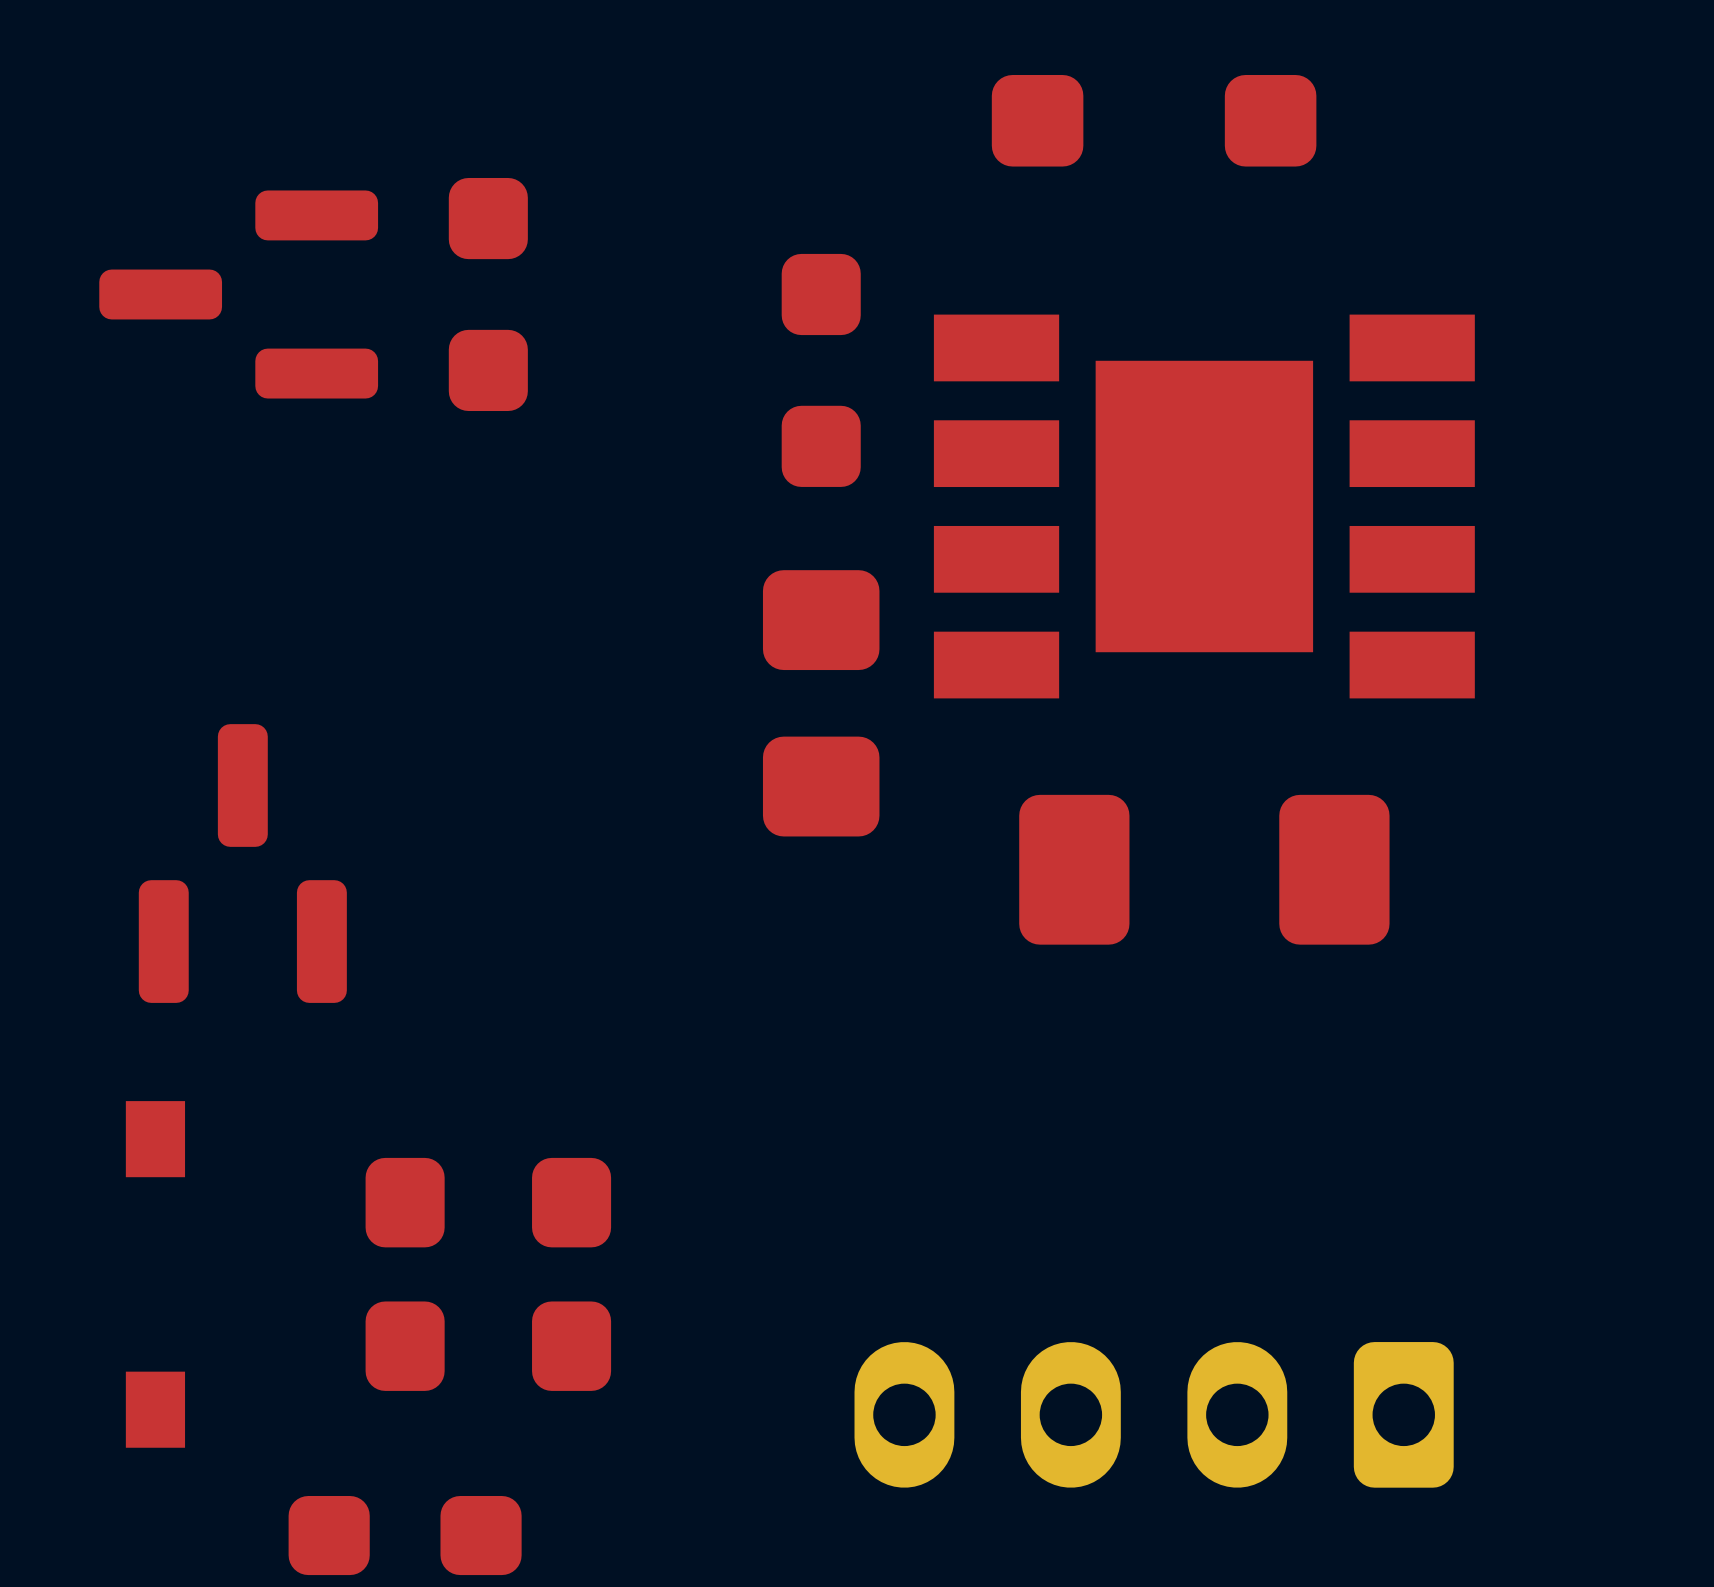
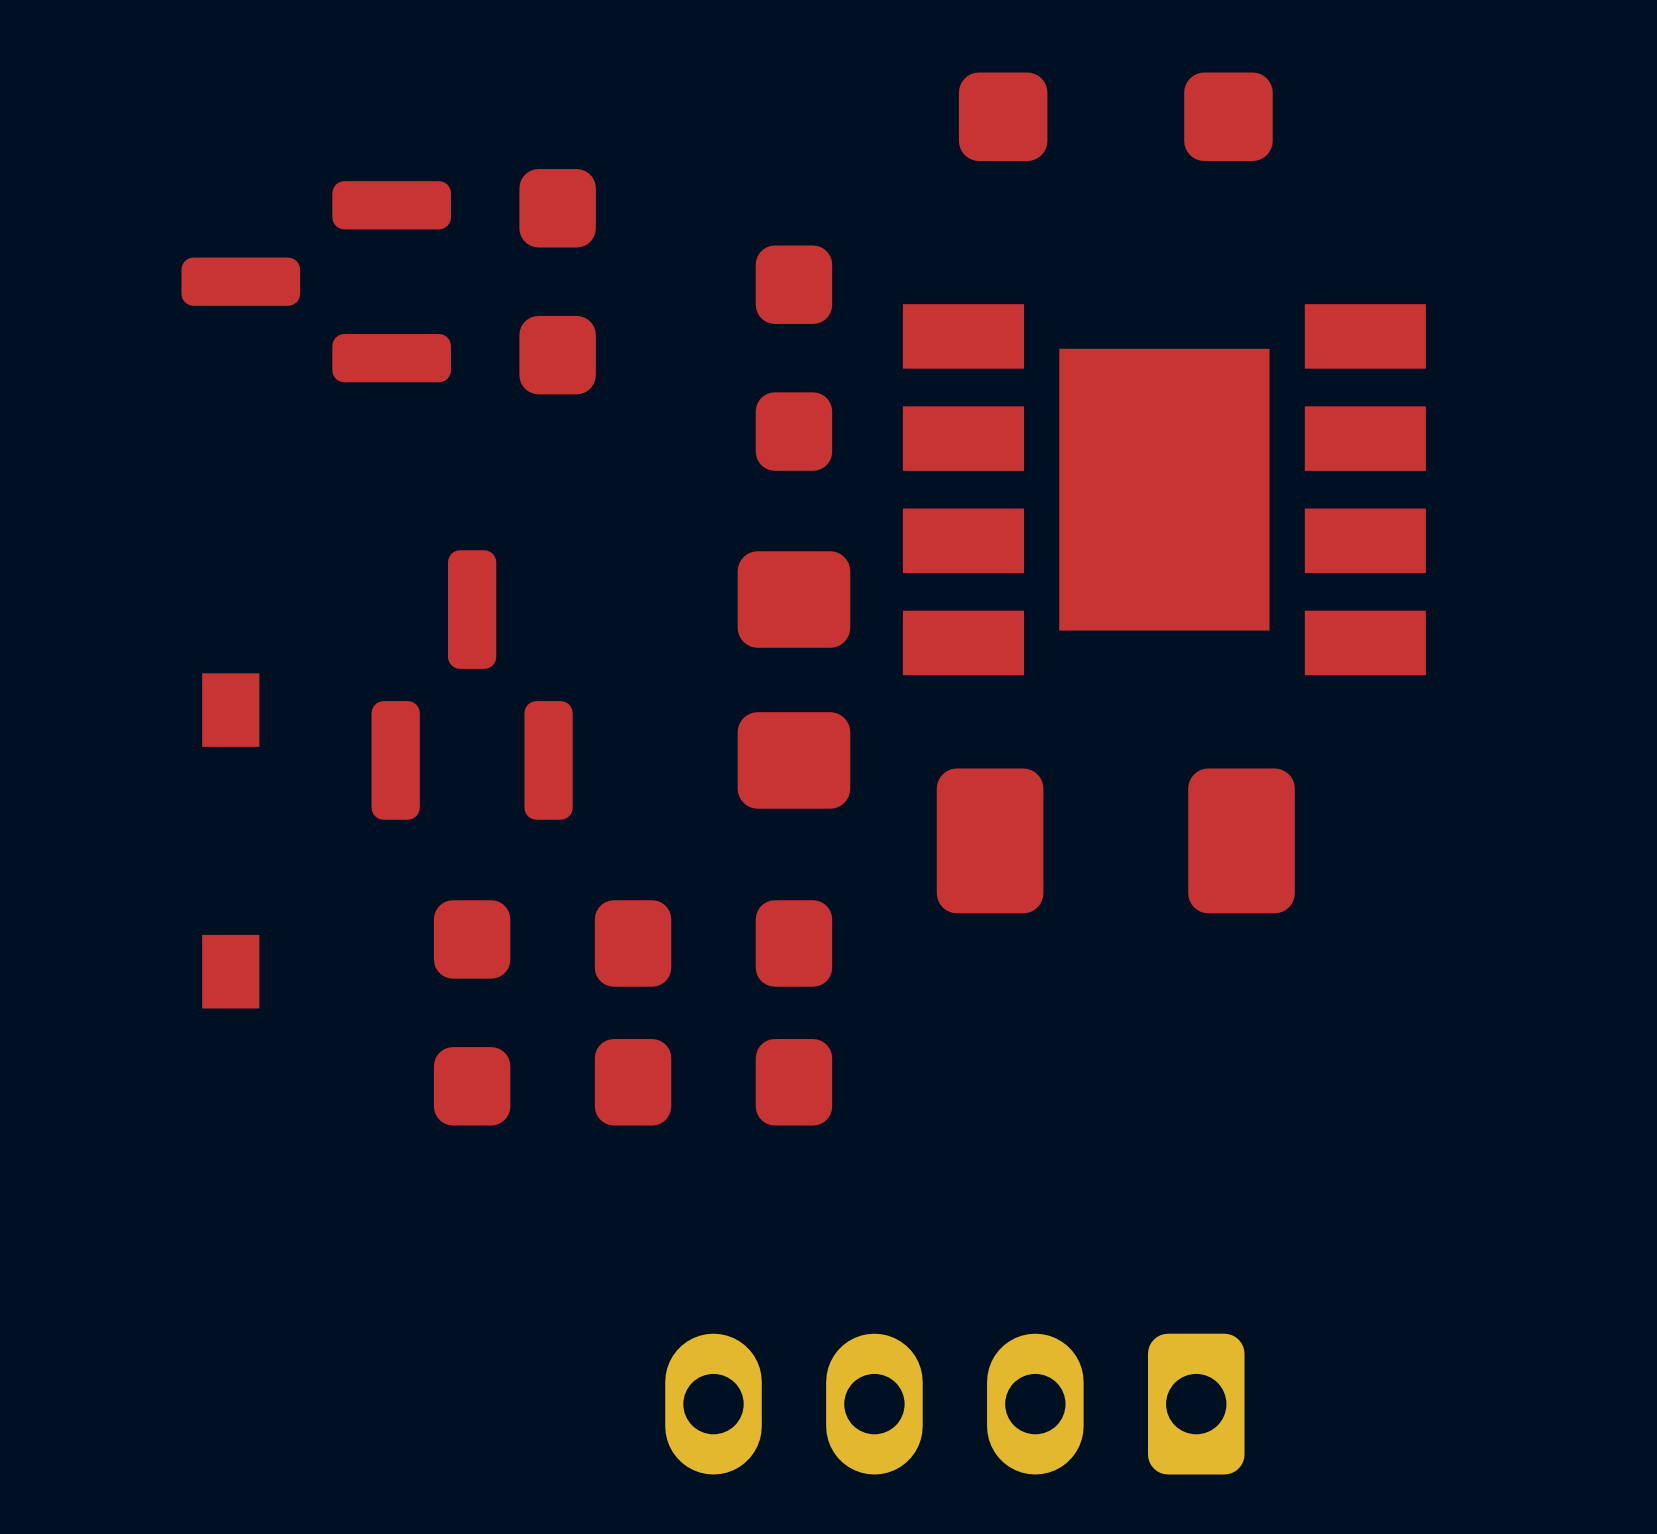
part position: (238, 294) -> (316, 281)
part position: (488, 294) -> (557, 281)
part: none -> (472, 685)
part footprint: [138, 724, 347, 1003] -> [202, 673, 260, 1009]
part position: (1204, 869) -> (1115, 840)
part: none -> (472, 1012)
part: none -> (633, 1012)
part: none -> (793, 1012)
part: (155, 1274) -> none
part: (405, 1274) -> none
part: (571, 1274) -> none
part position: (1154, 1414) -> (954, 1404)
part: (405, 1535) -> none

